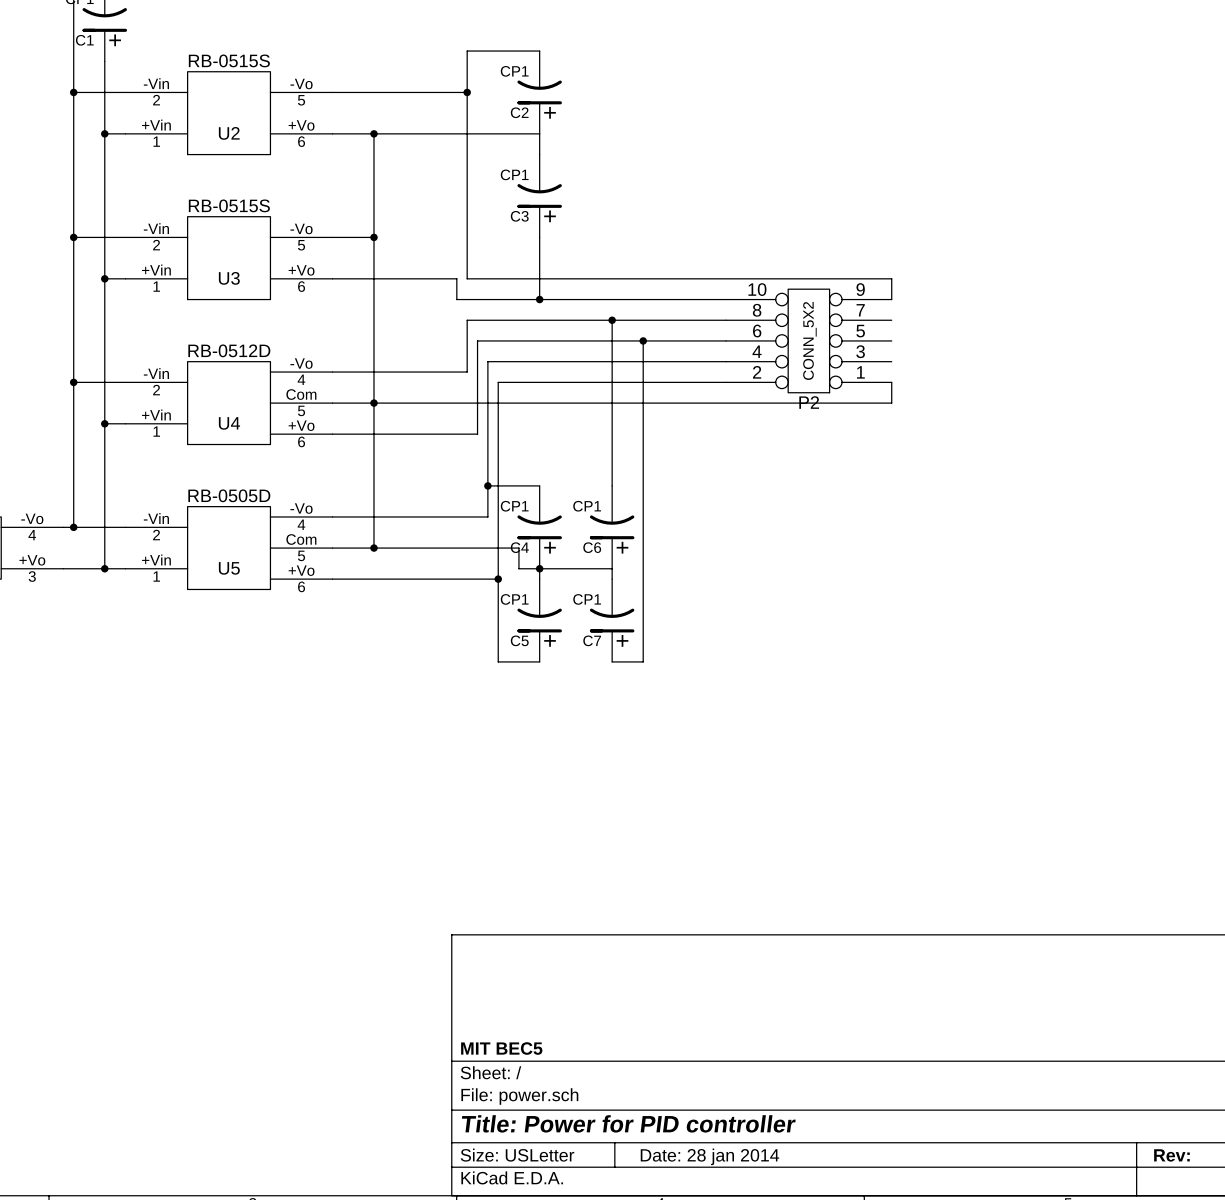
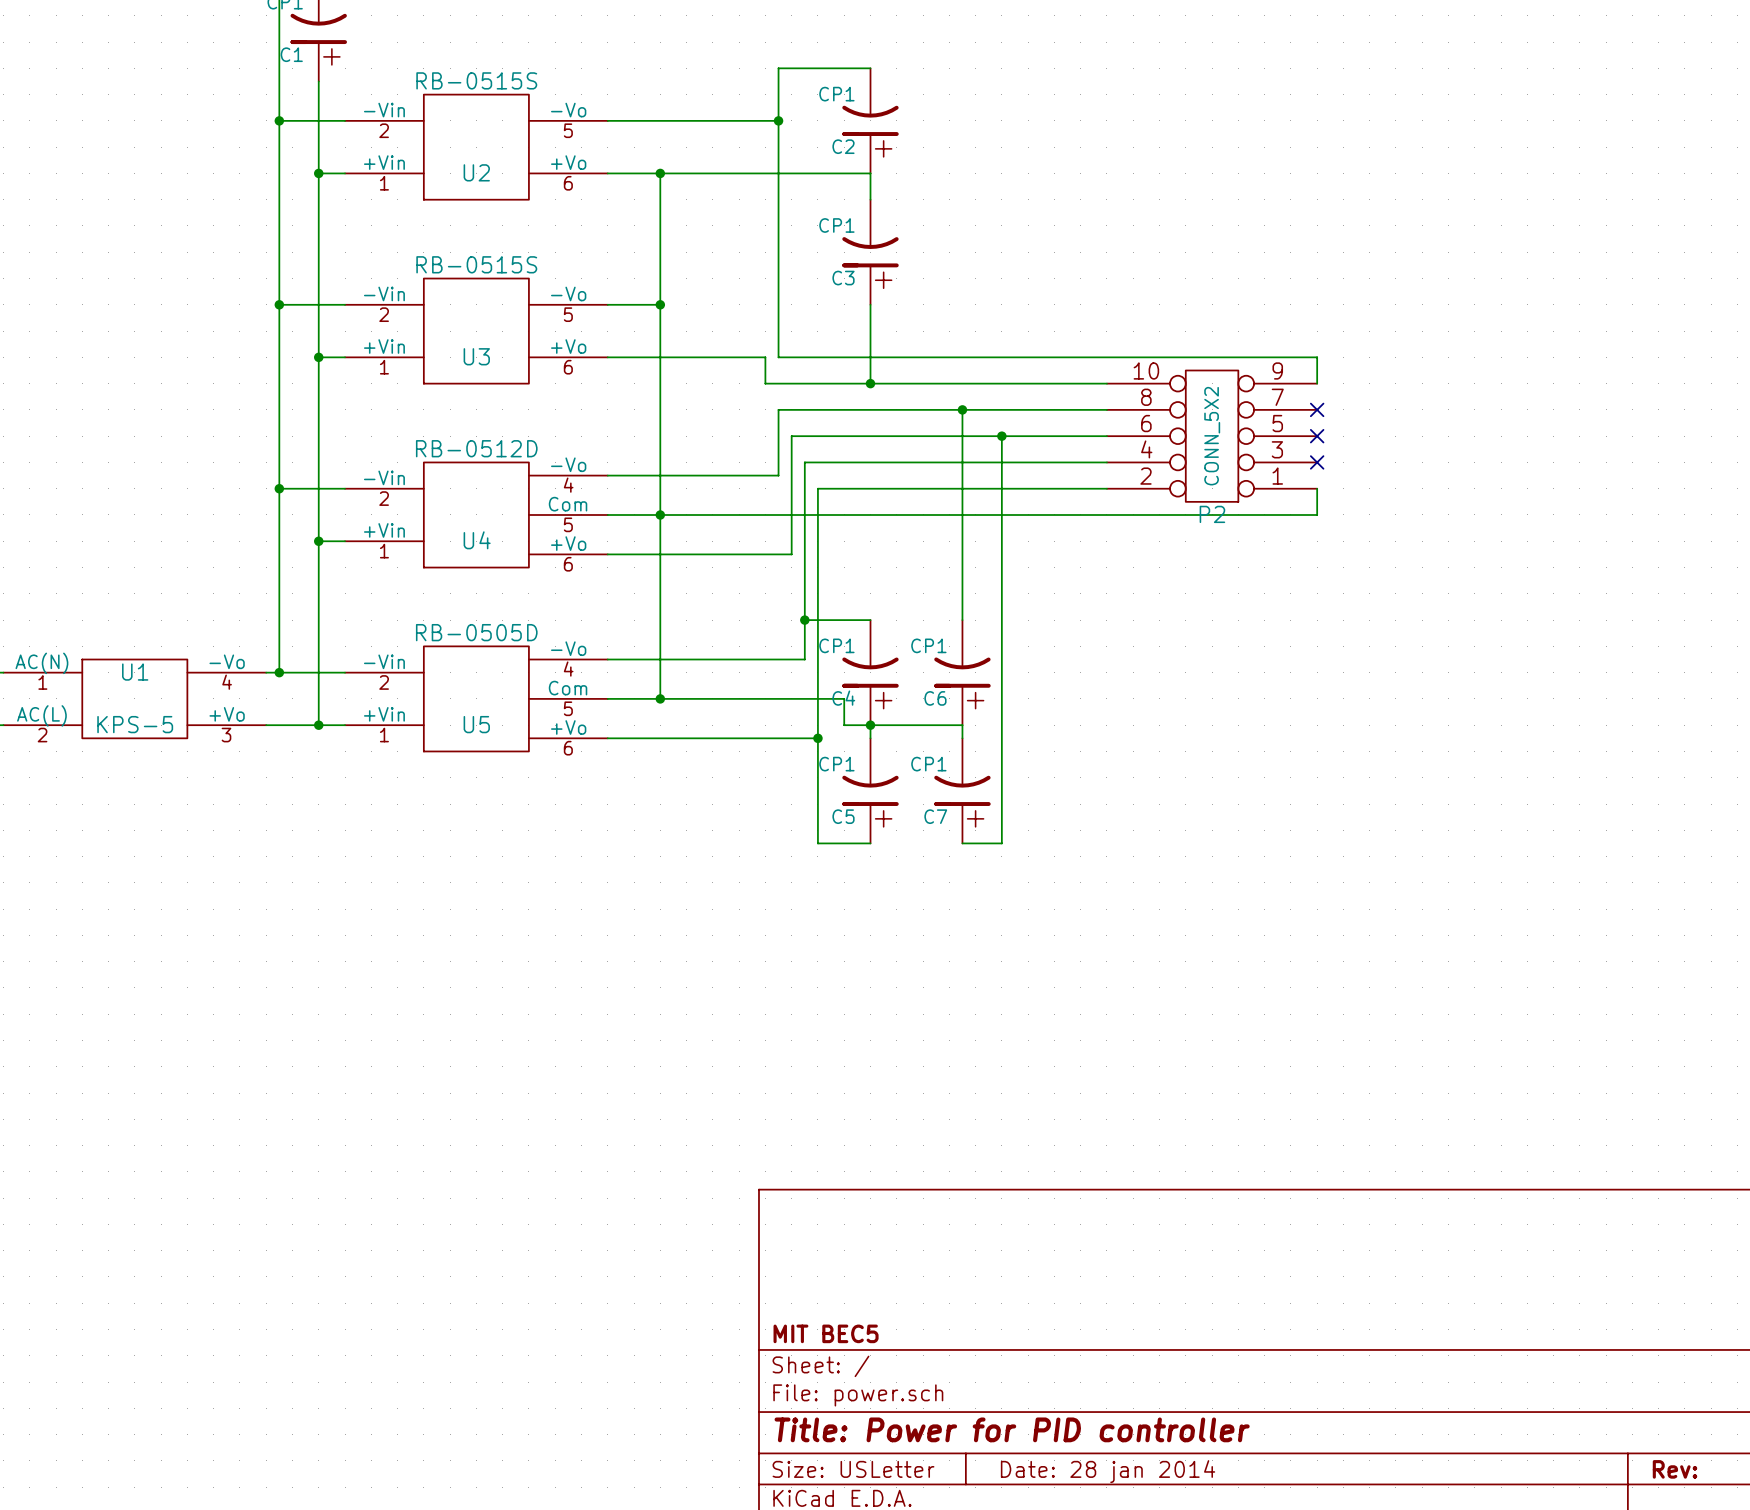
no-connect mark: none -> (1317, 409)
no-connect mark: none -> (1317, 436)
no-connect mark: none -> (1317, 462)

